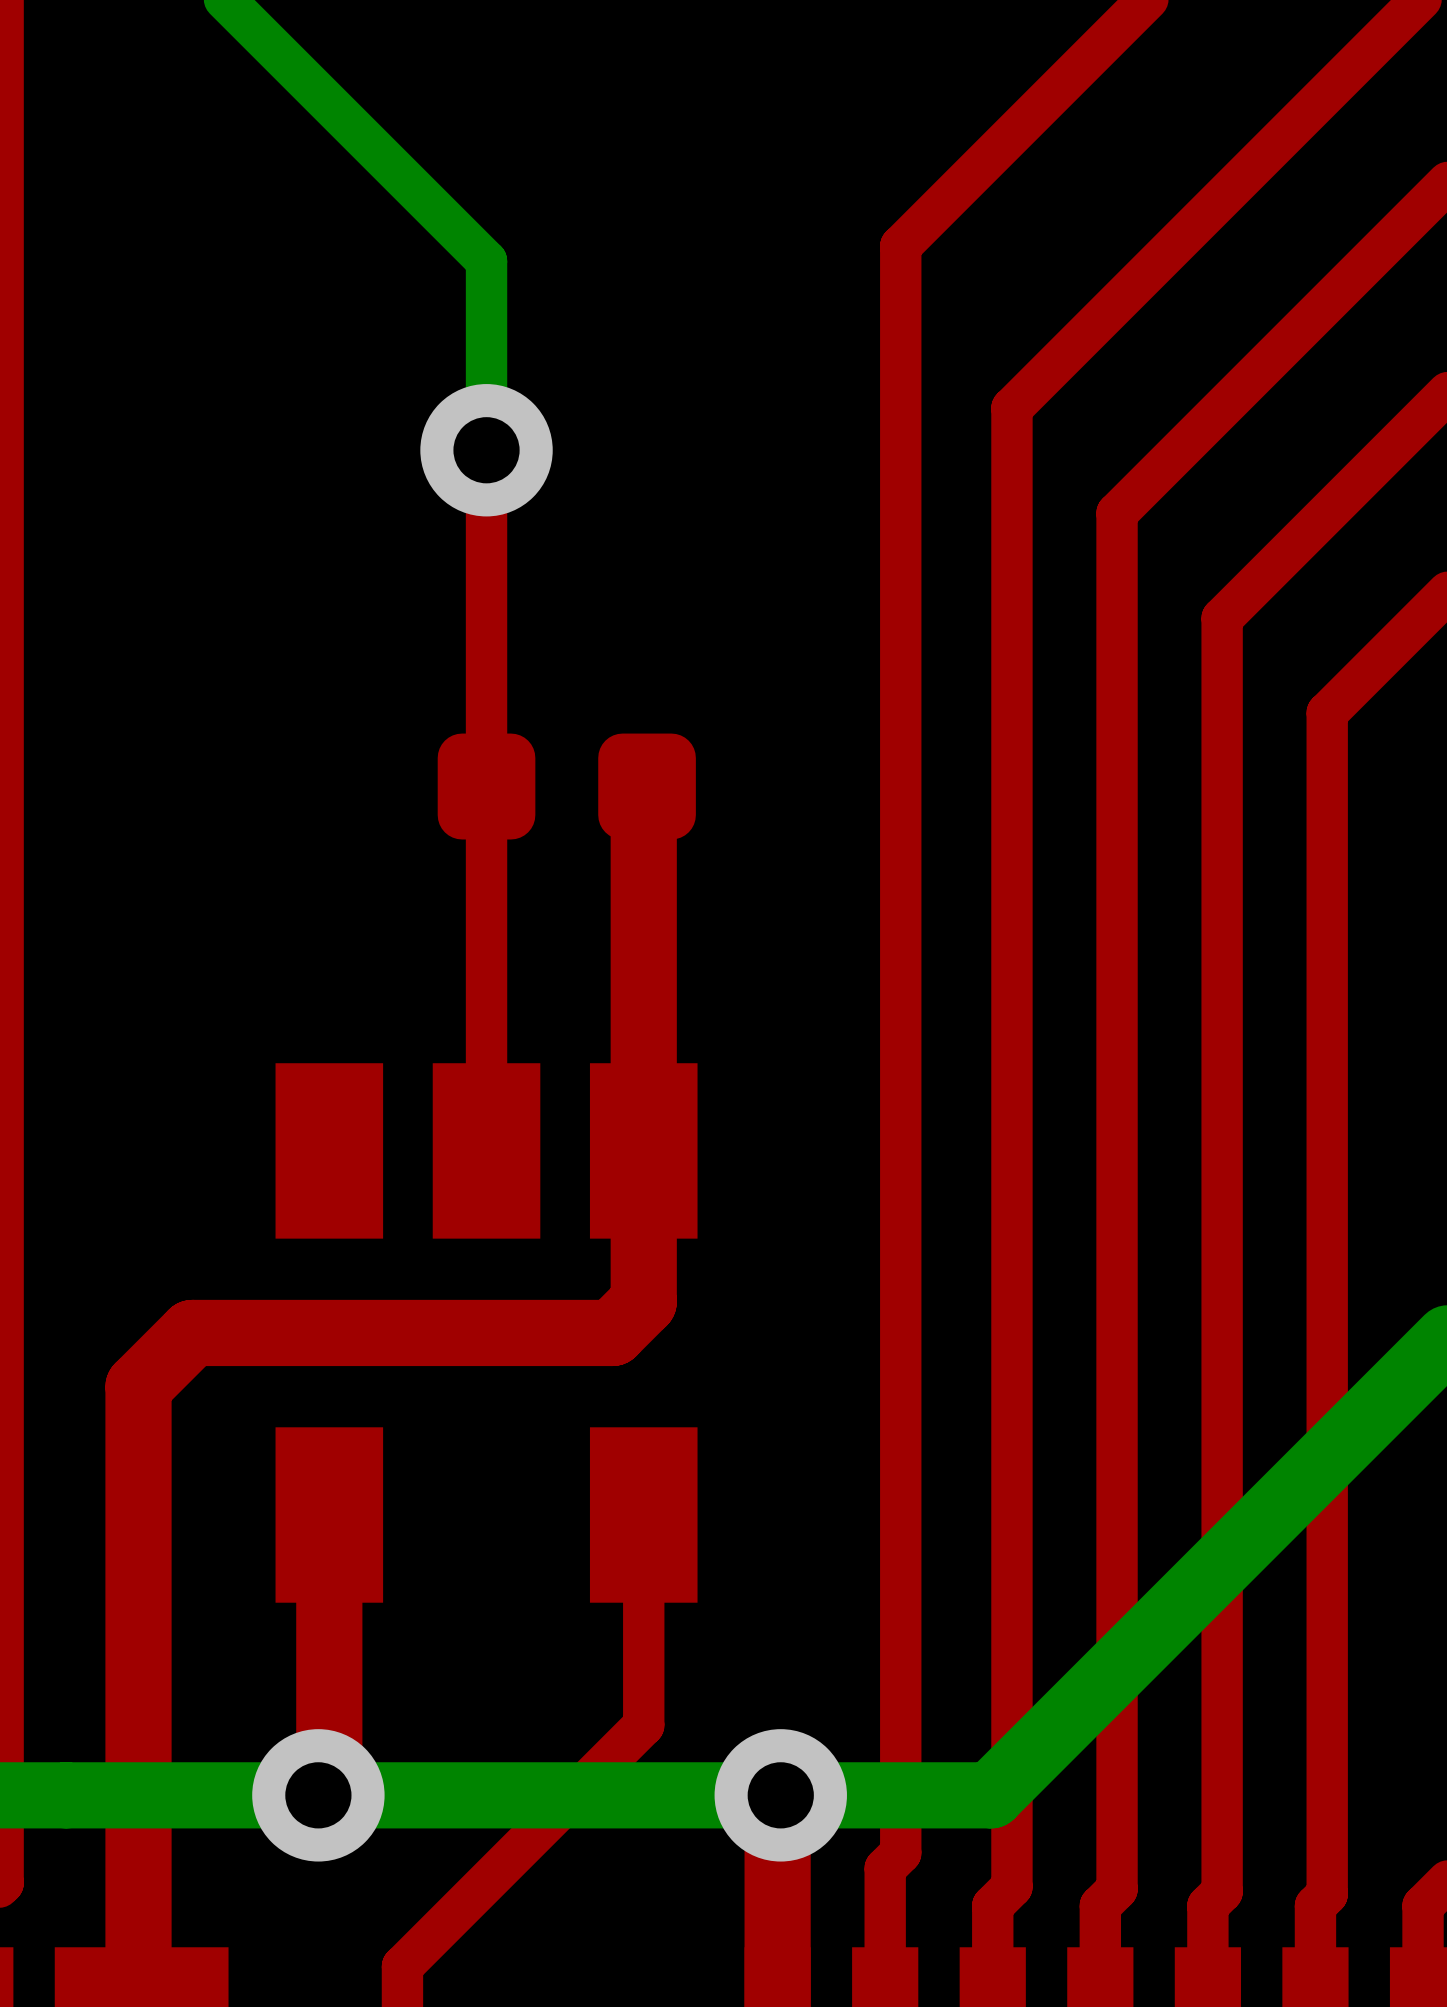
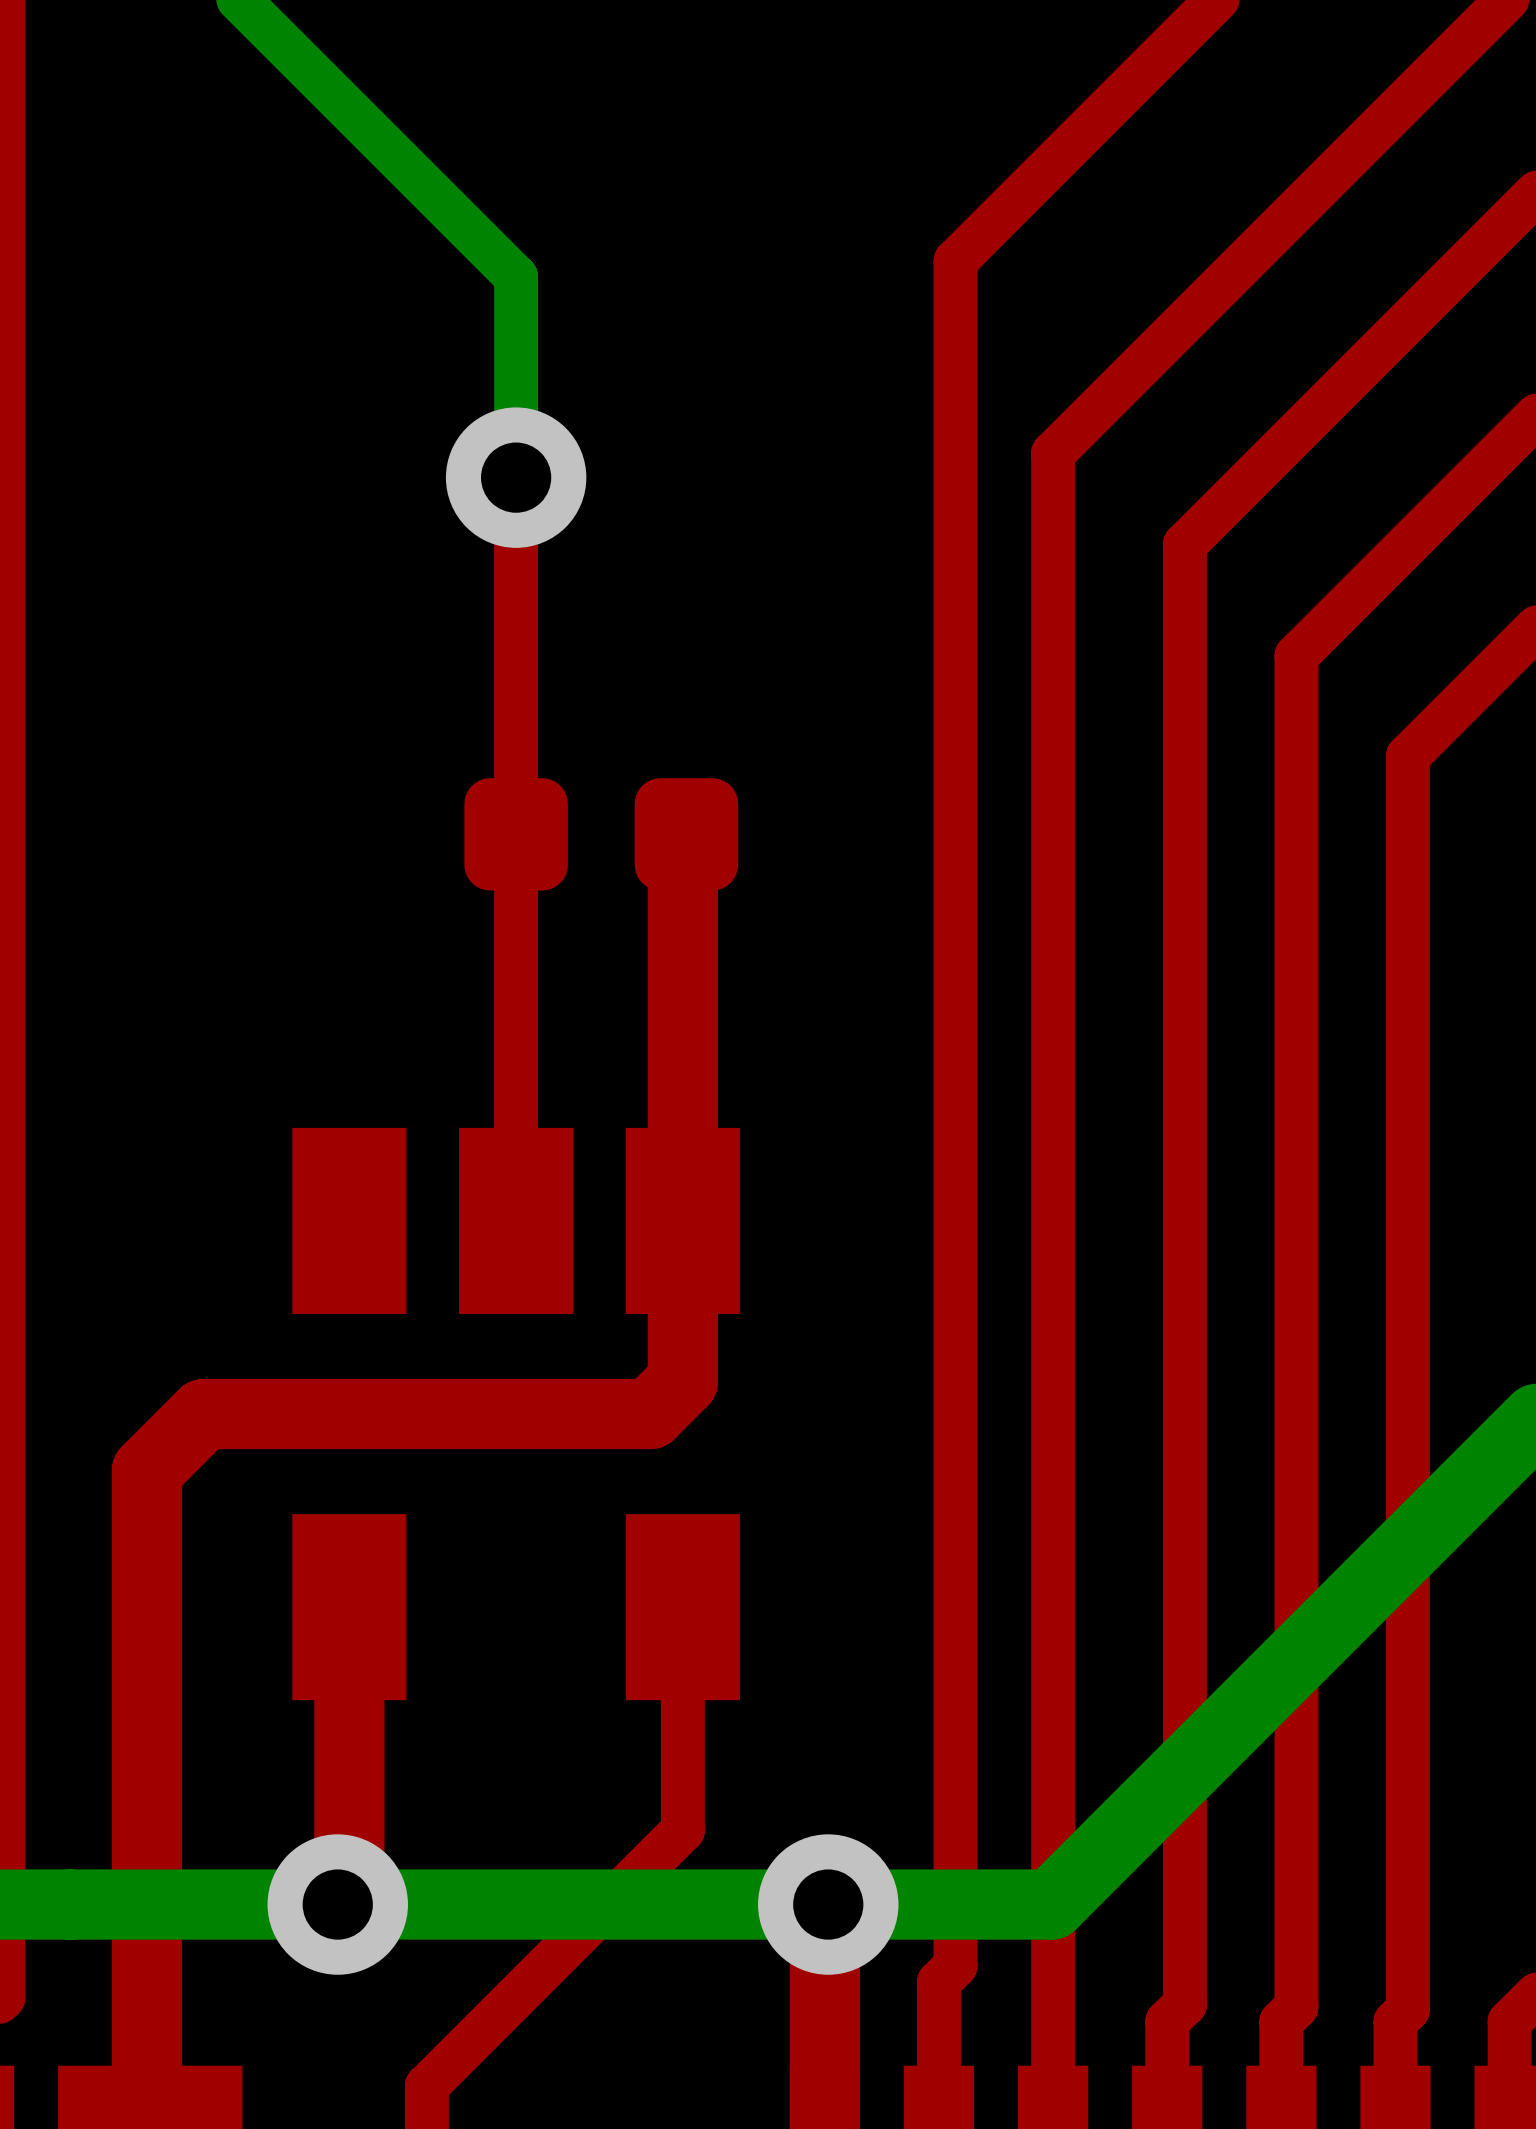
top track: (1011, 408) (1011, 1886) (992, 1905) -> (1073, 433) (1053, 453) (1053, 2021)

